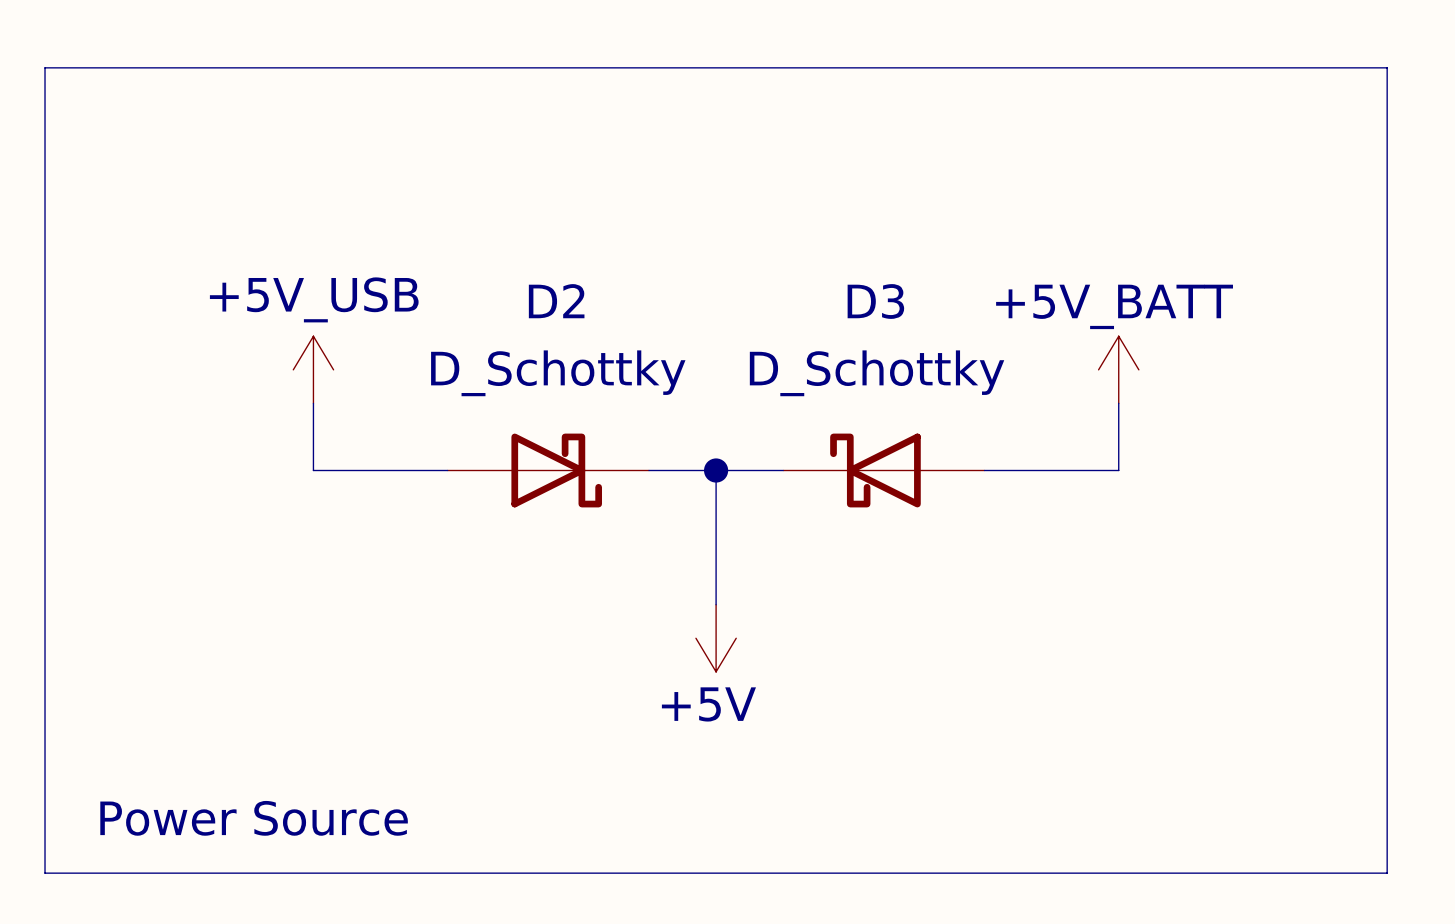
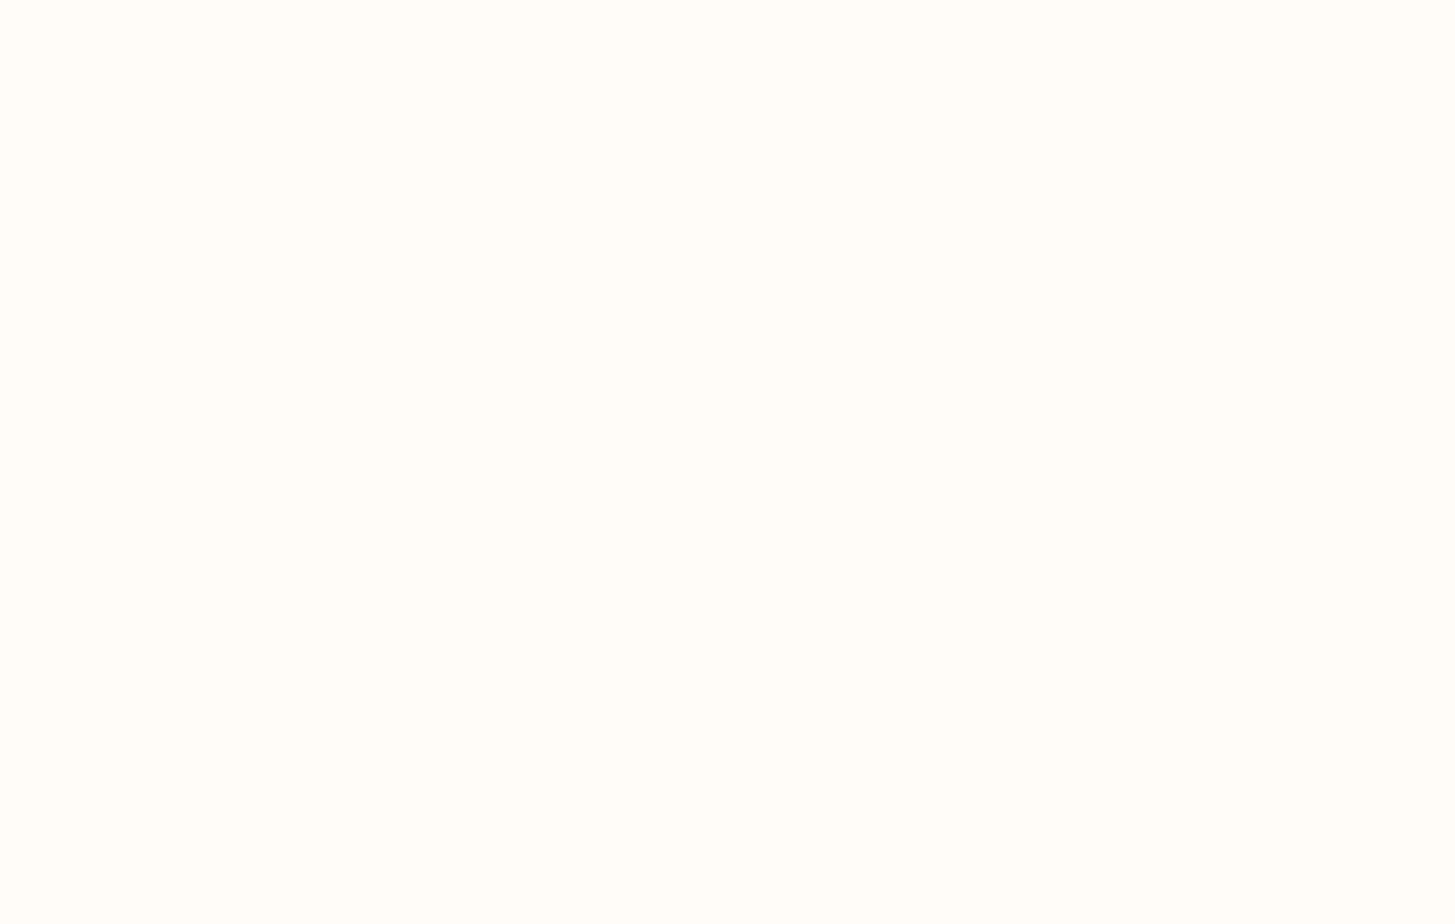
line: (45, 67) (1387, 67) (1387, 873) (45, 873) (45, 67) -> none
power symbol: +5V_USB (313, 369) -> none
power symbol: +5V_BATT (1118, 369) -> none
wire: (313, 403) (313, 470) (447, 470) -> none
wire: (1118, 403) (1118, 470) (984, 470) -> none
D2: D_Schottky (548, 470) -> none
wire: (648, 470) (783, 470) -> none
wire: (716, 470) (716, 604) -> none
junction: (716, 470) -> none
D3: D_Schottky (883, 470) -> none
power symbol: +5V (716, 638) -> none
text: Power Source (254, 818) -> none

